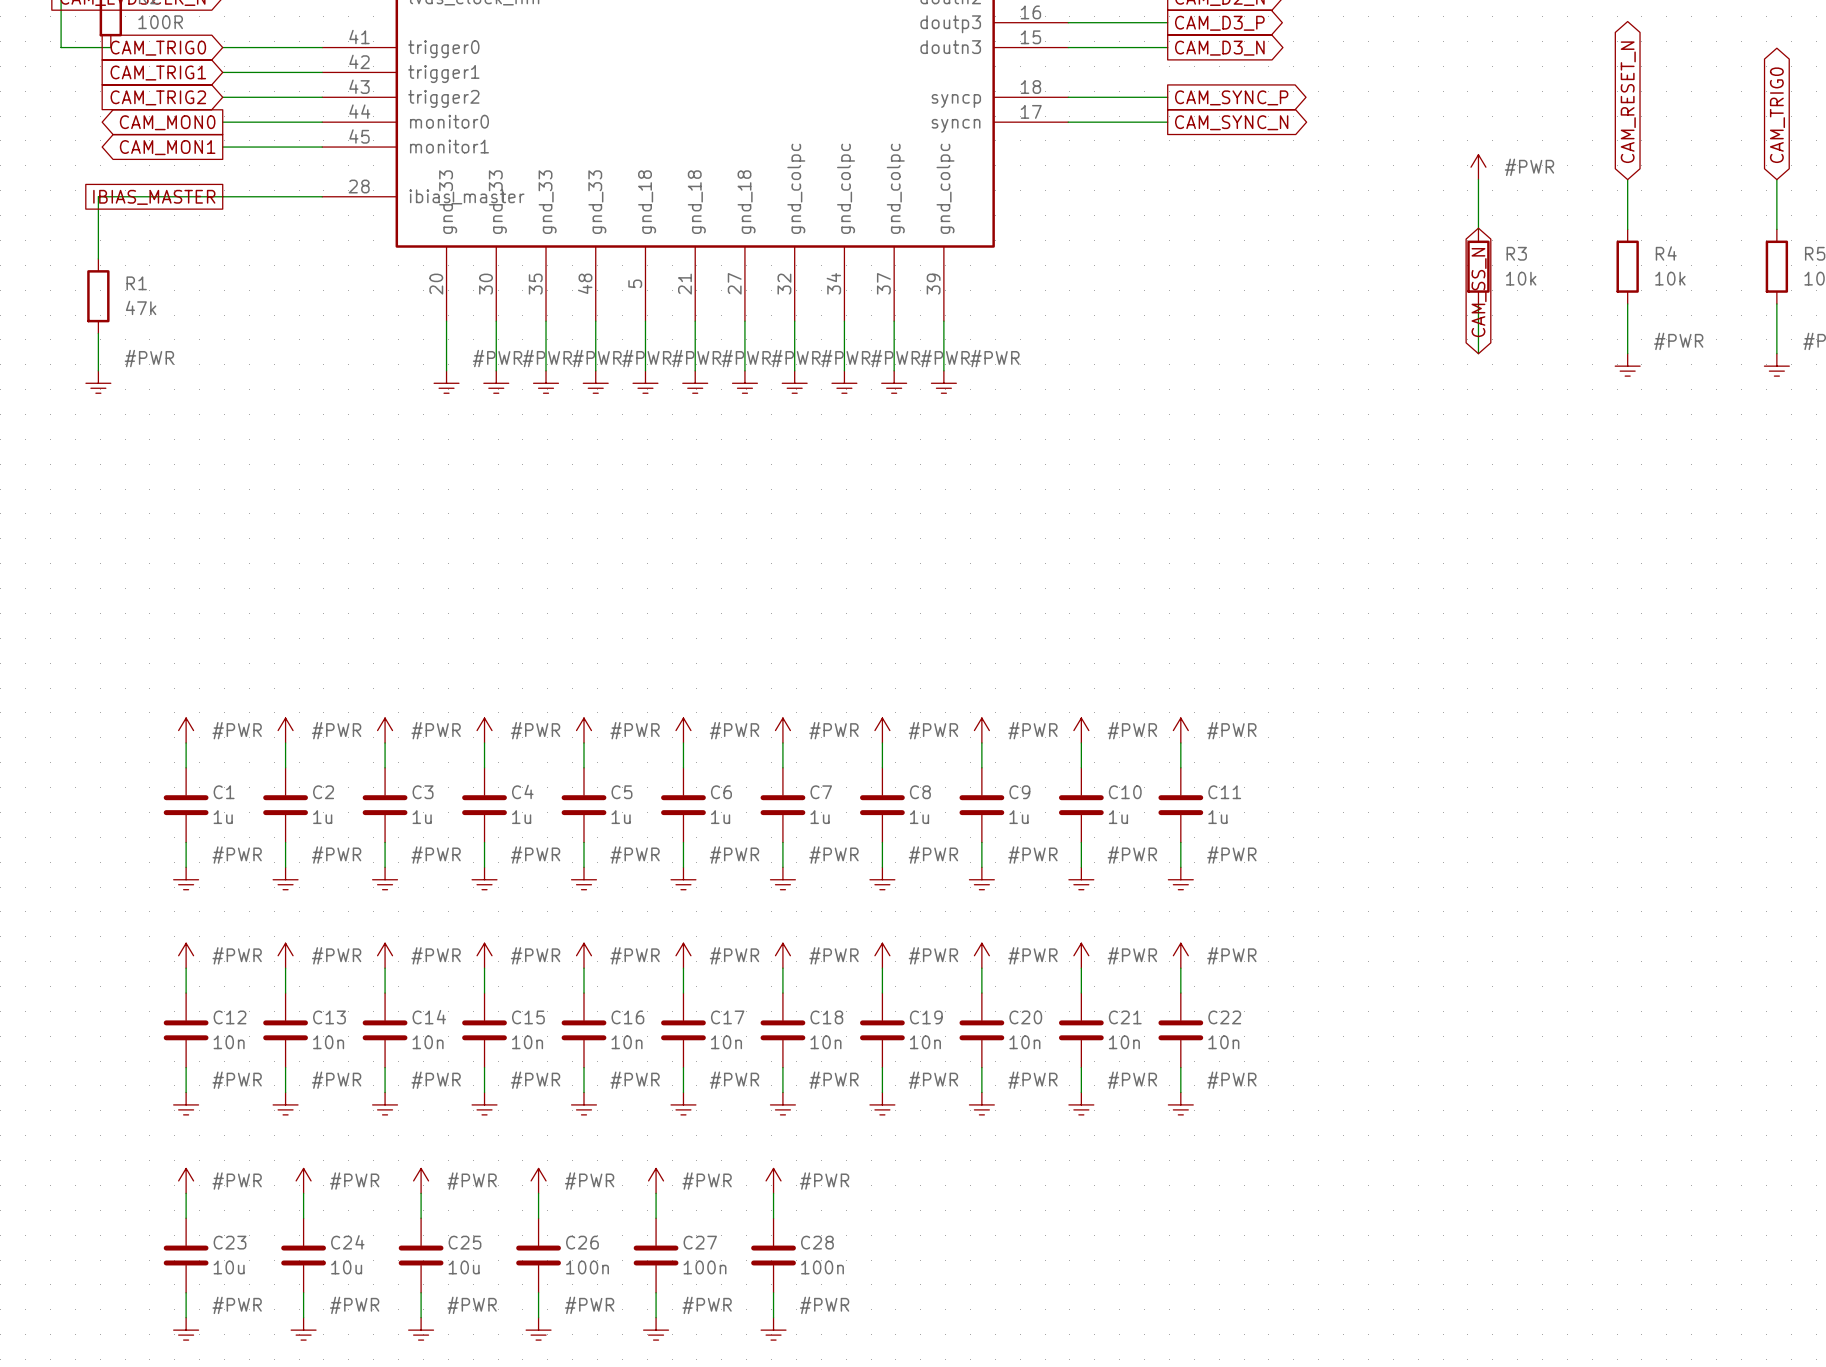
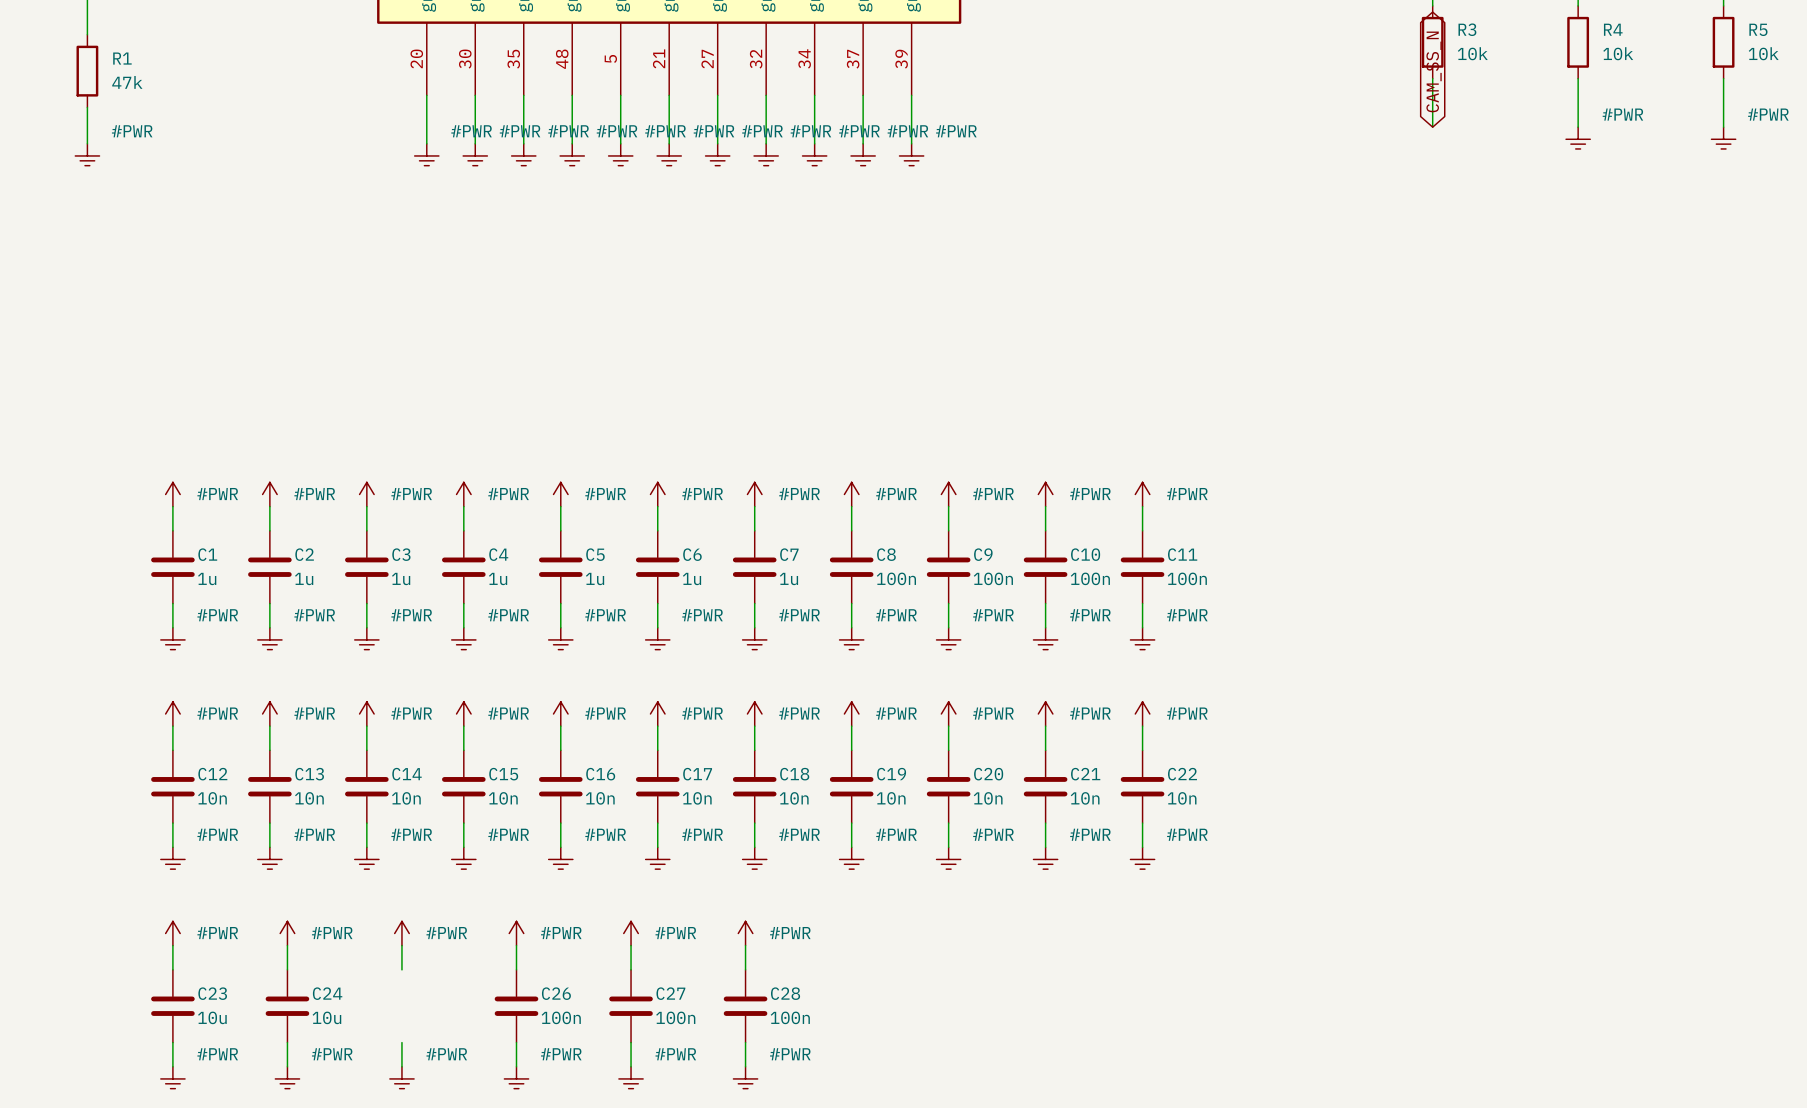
C8 value: 1u (919, 817) -> 100n (896, 578)
C9 value: 1u (1018, 817) -> 100n (993, 578)
C10 value: 1u (1118, 817) -> 100n (1090, 578)
C11 value: 1u (1217, 817) -> 100n (1187, 578)
C25: 10u (421, 1255) -> none

